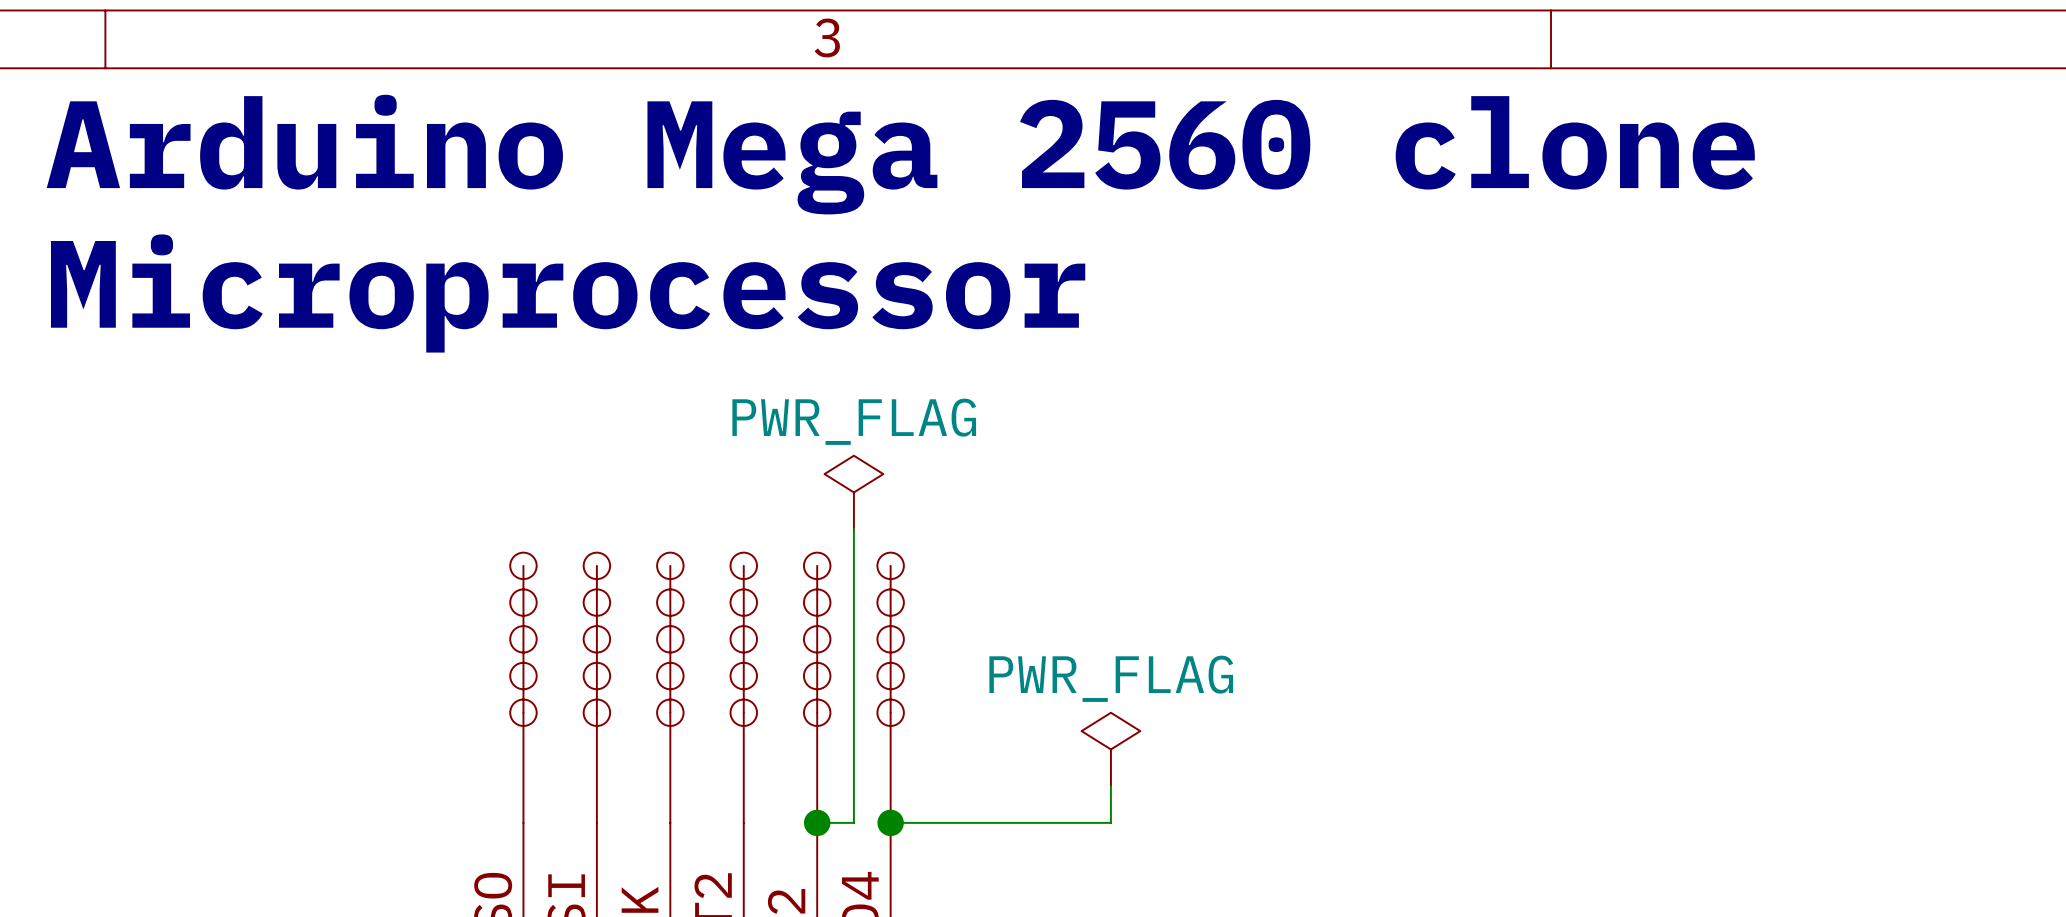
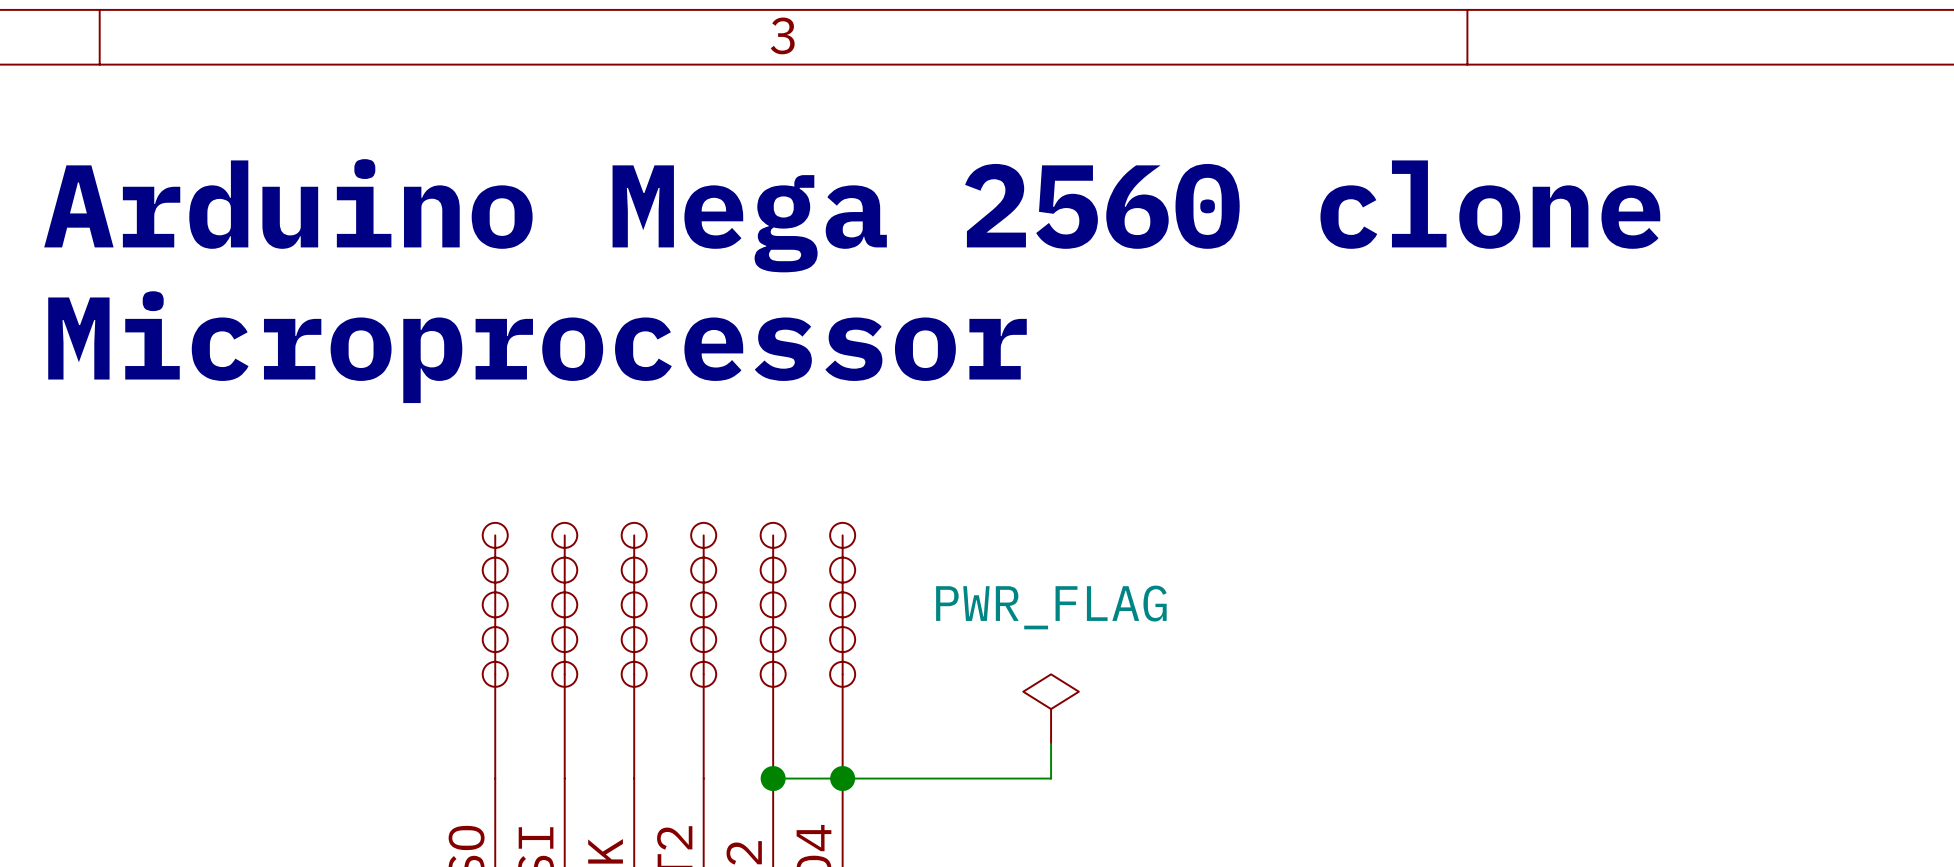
text position: Arduino Mega 2560 clone (900, 154) -> Arduino Mega 2560 clone (852, 215)
text position: Microprocessor (568, 293) -> Microprocessor (537, 347)
power symbol: PWR_FLAG (853, 492) -> none
wire: (853, 529) (853, 822) -> (842, 778) (807, 778)
power symbol text position: PWR_FLAG (1111, 678) -> PWR_FLAG (1051, 607)

